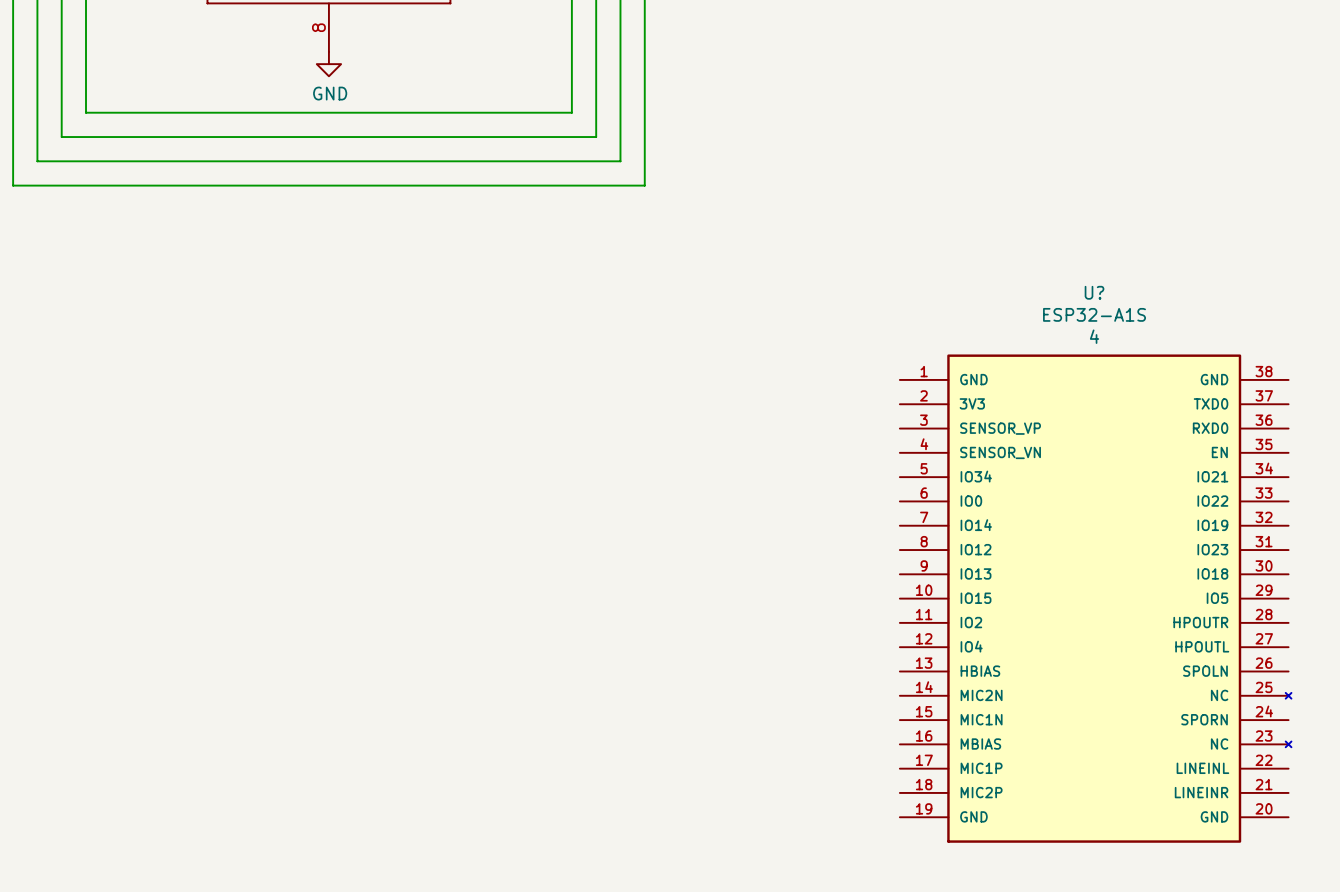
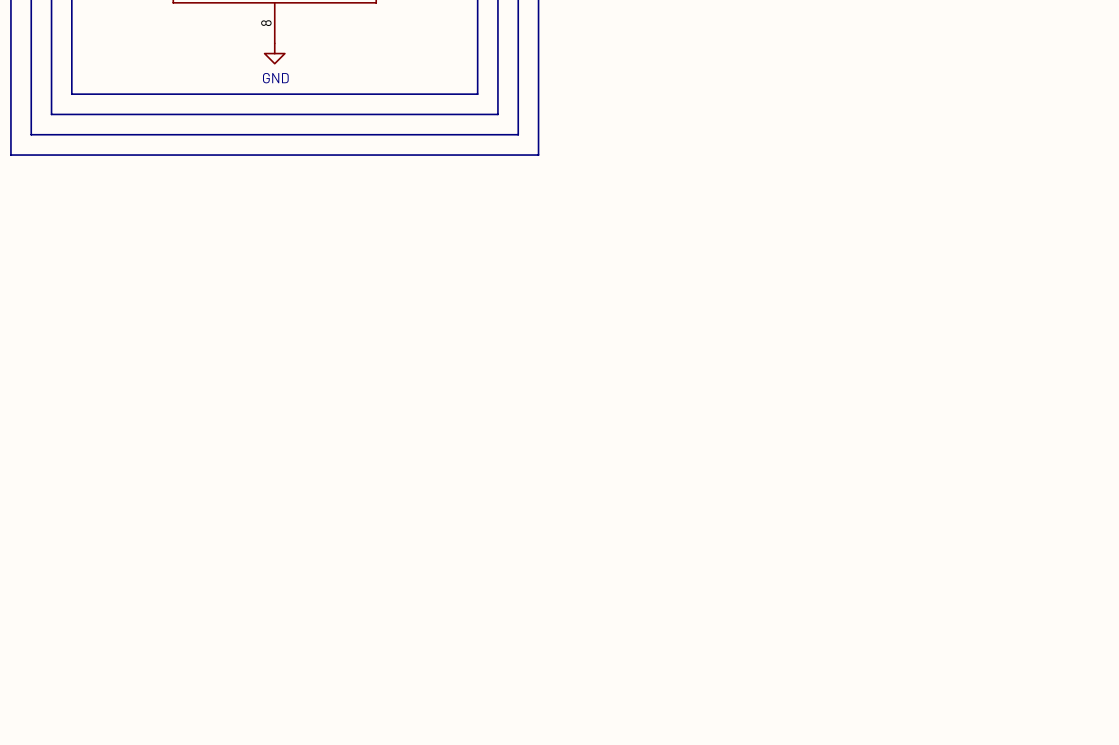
U?: ESP32-A1S (1095, 598) -> none

